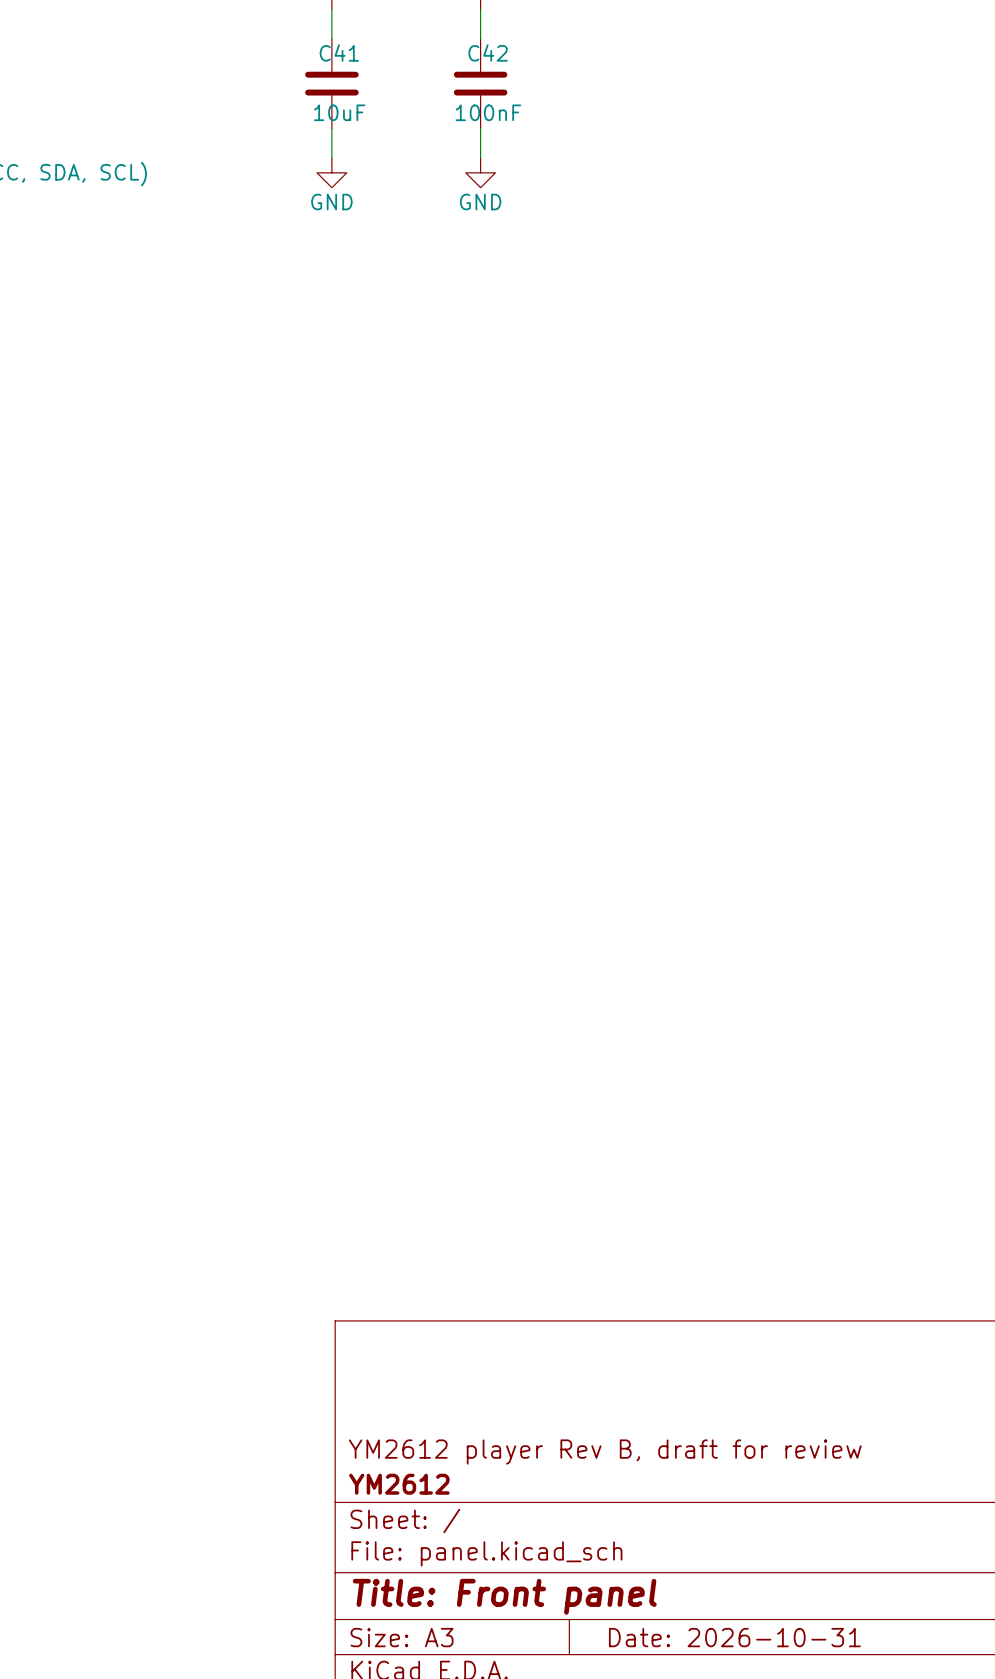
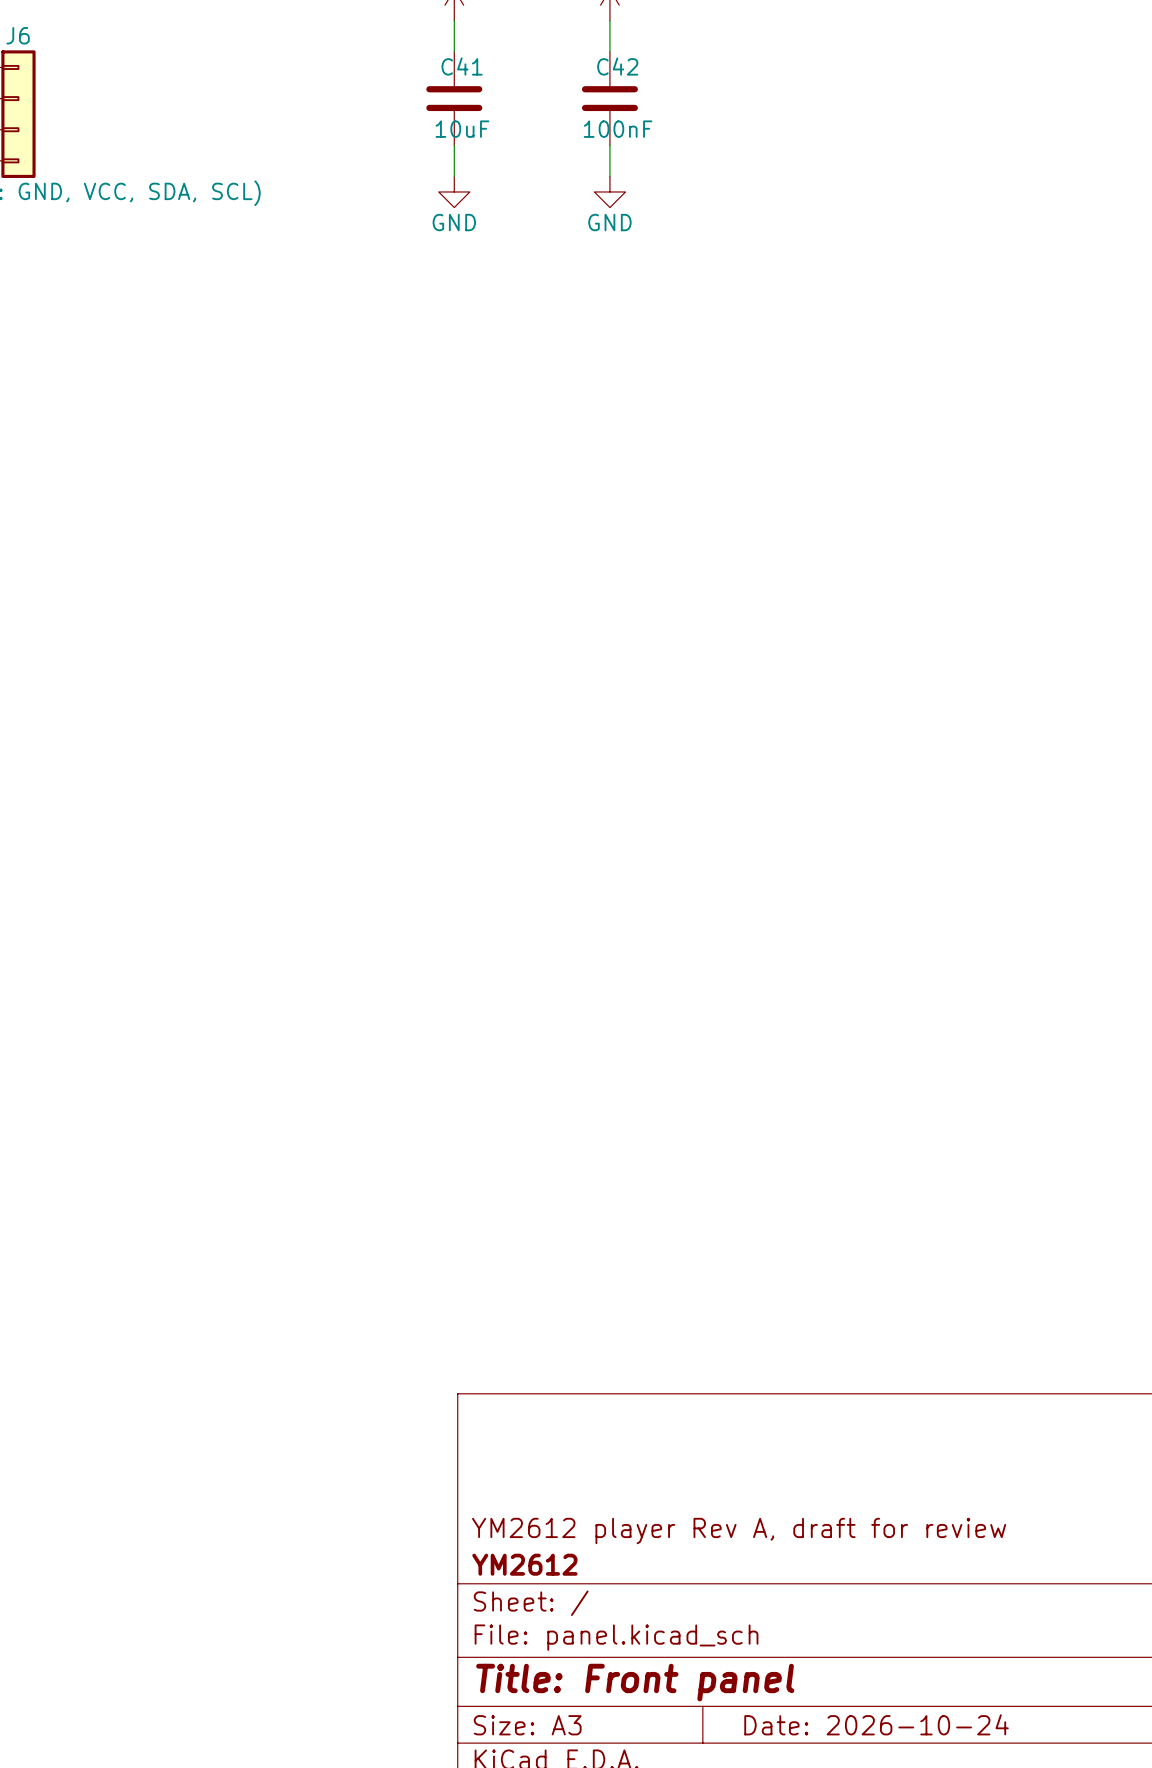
title block: YM2612 player Rev B, draft for review (605, 1452) -> YM2612 player Rev A, draft for review (739, 1531)
title block: Date: 2026-10-31 (734, 1637) -> Date: 2026-10-24 (876, 1724)

